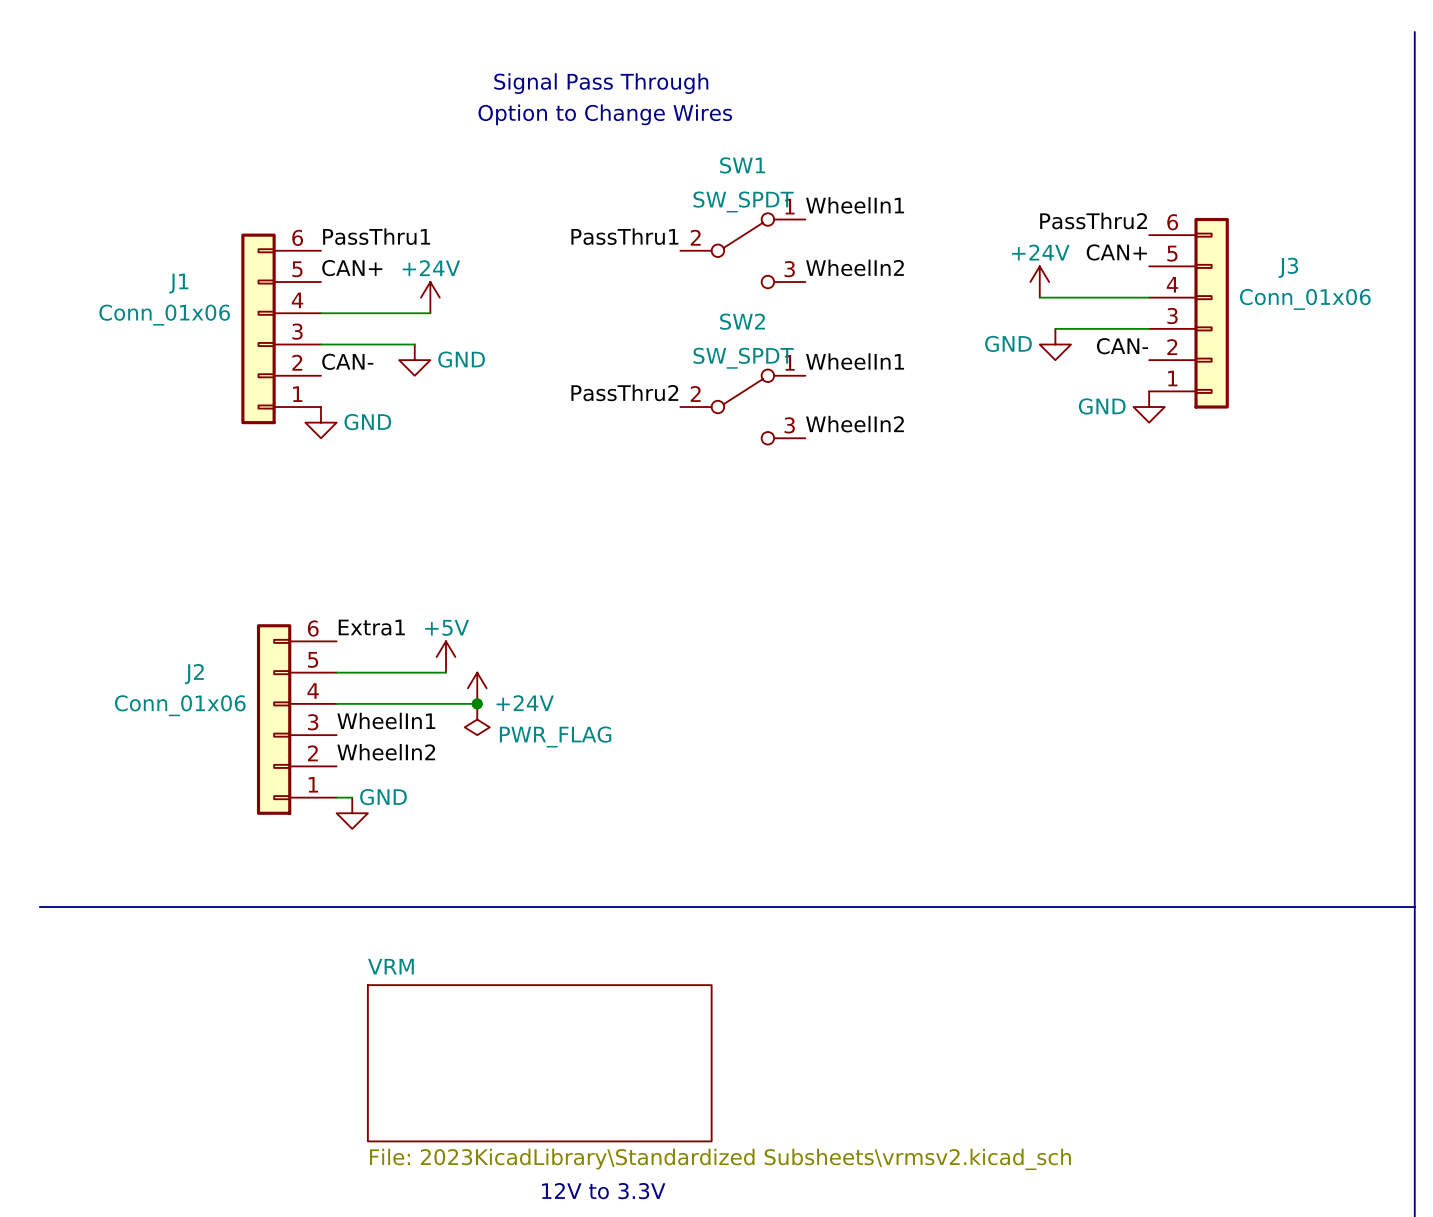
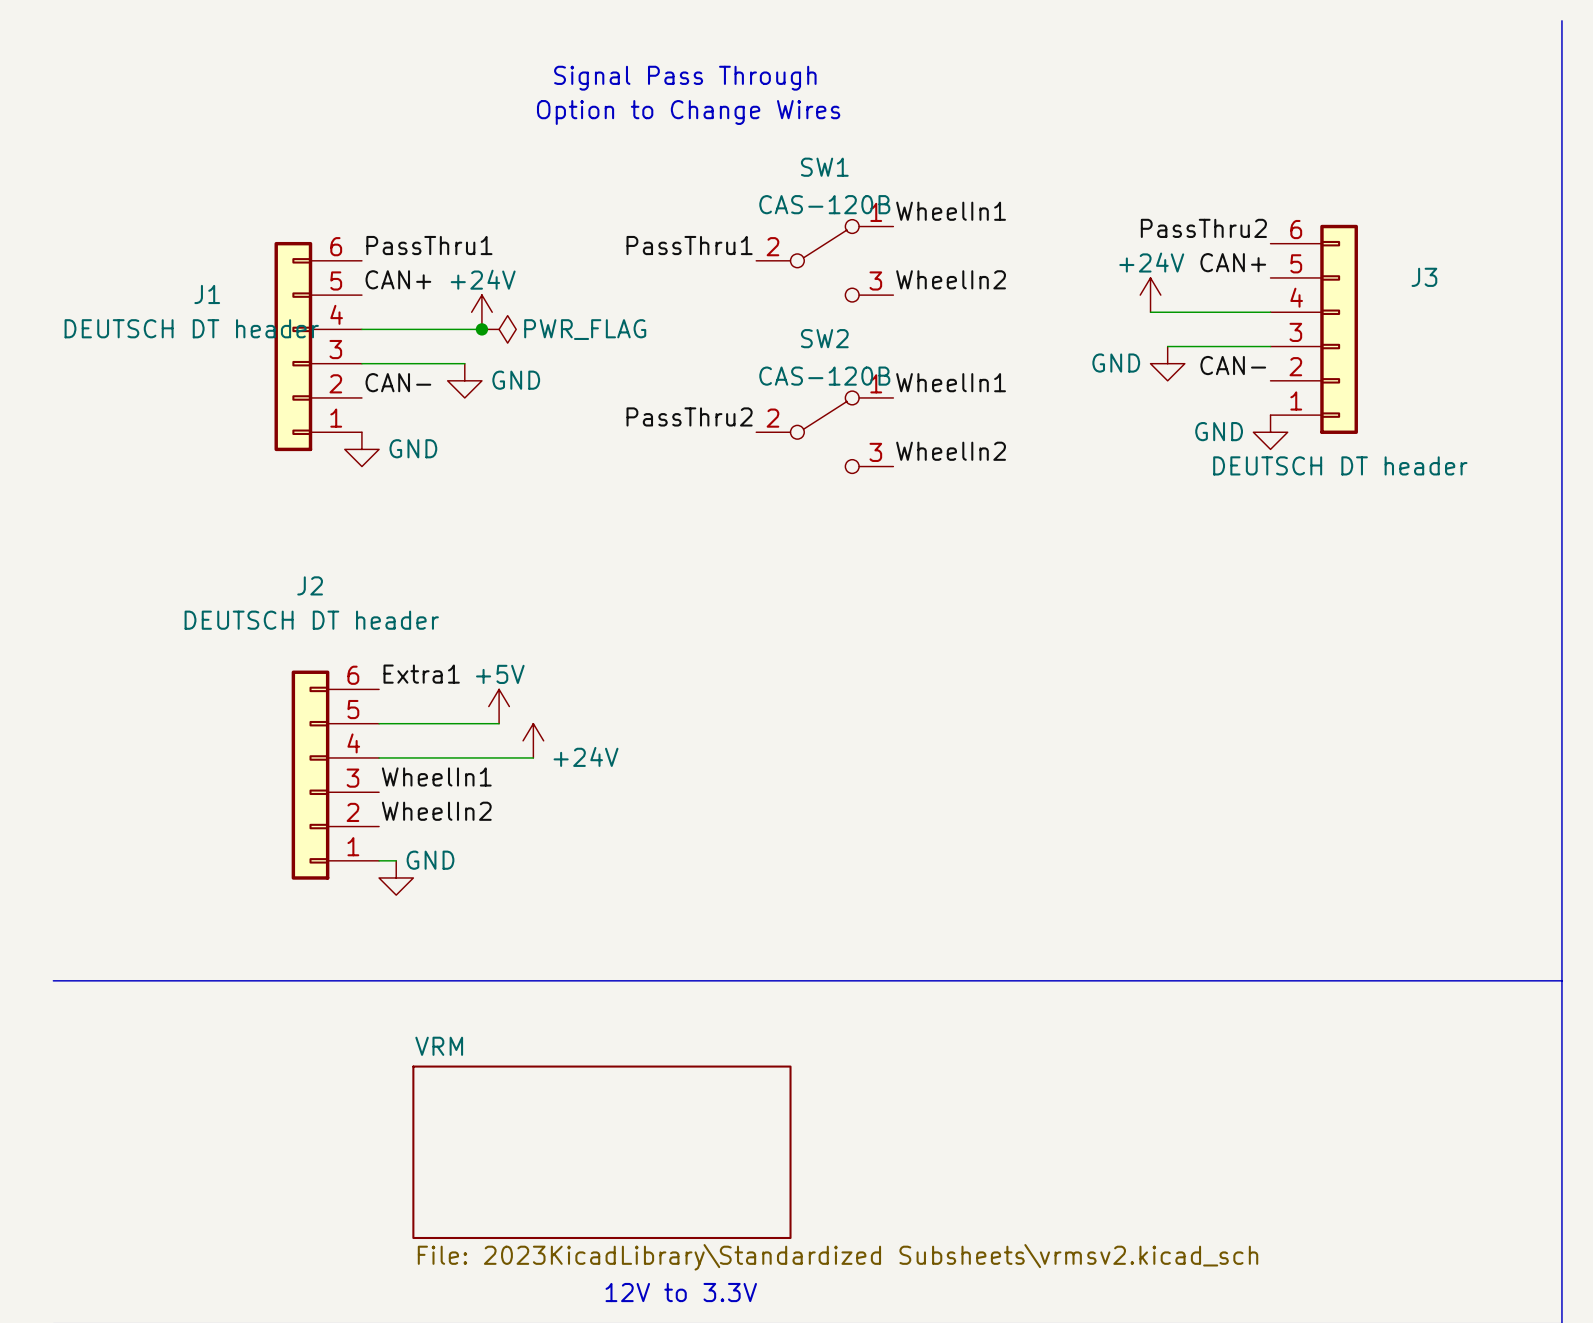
SW1 value: SW_SPDT (743, 201) -> CAS-120B (824, 204)
J3 value: Conn_01x06 (1305, 299) -> DEUTSCH DT header (1340, 465)
junction: none -> (481, 329)
power symbol: none -> PWR_FLAG (499, 329)
J1 value: Conn_01x06 (164, 315) -> DEUTSCH DT header (191, 328)
SW2 value: SW_SPDT (743, 358) -> CAS-120B (824, 376)
J2 name position: J2 (194, 674) -> J2 (310, 585)
junction: (477, 703) -> none
J2 value: Conn_01x06 (180, 705) -> DEUTSCH DT header (311, 620)
power symbol: PWR_FLAG (477, 719) -> none

